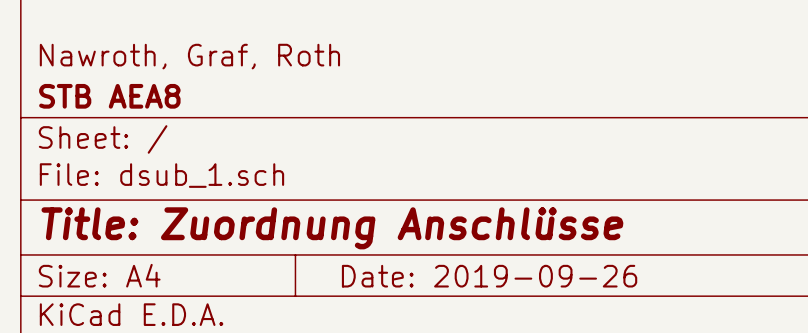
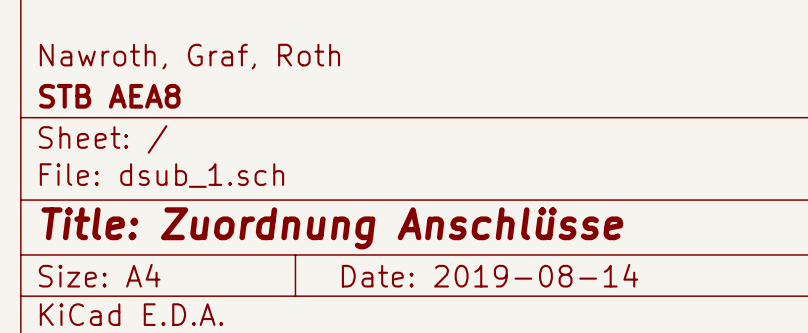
title block: Date: 2019-09-26 (489, 276) -> Date: 2019-08-14 (490, 275)

